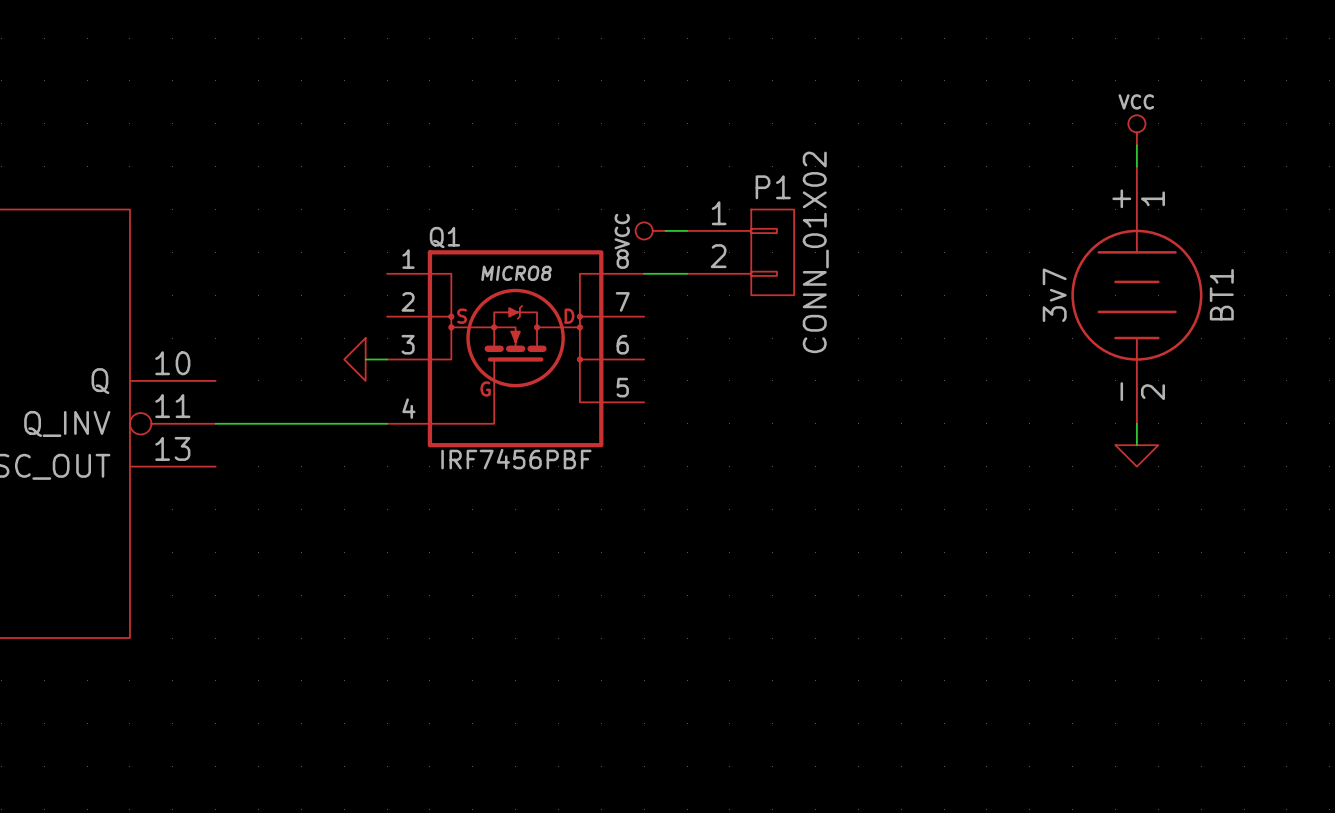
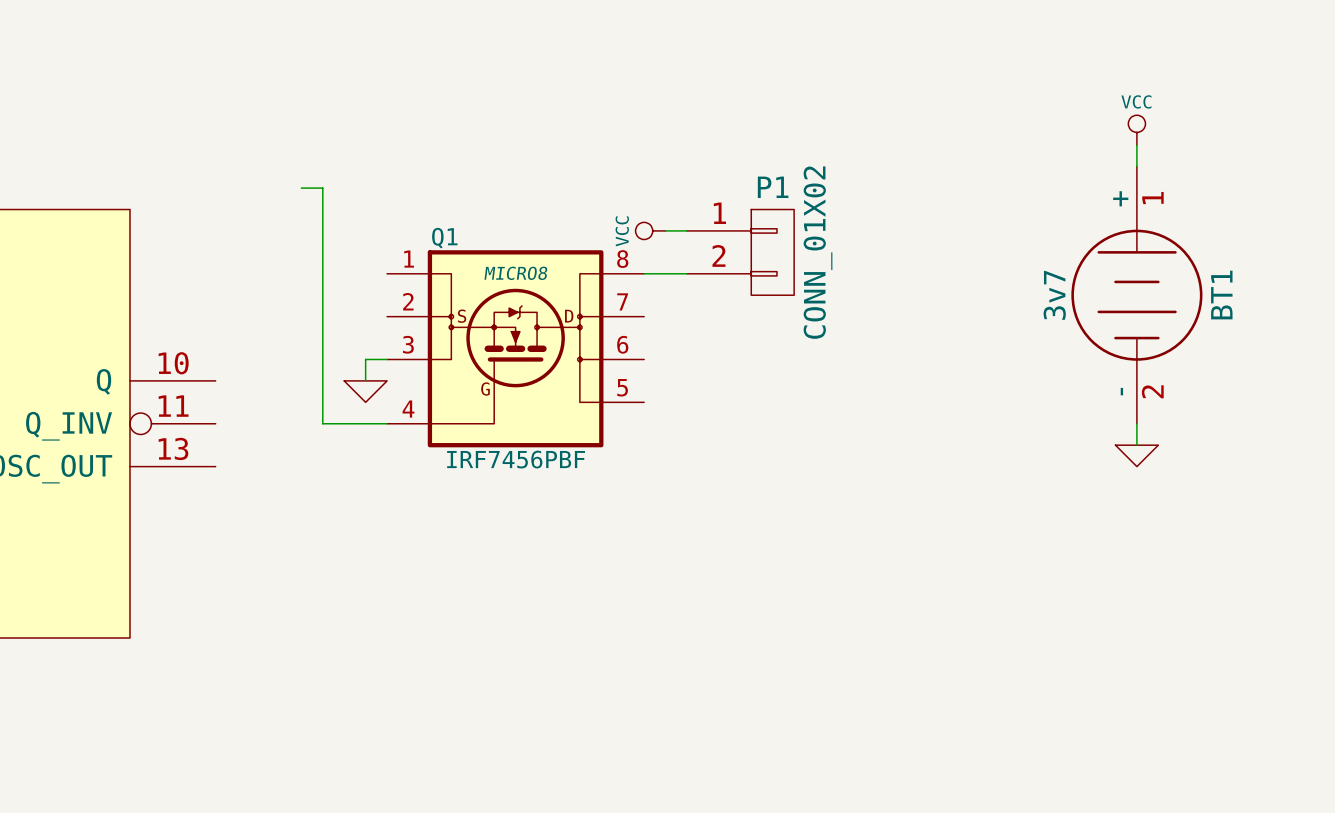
power symbol rotation: 0° (354, 359) -> 90° counterclockwise (365, 391)
power symbol position: (354, 359) -> (365, 391)
wire: (215, 423) (322, 423) -> (301, 188) (322, 188) (322, 423)

